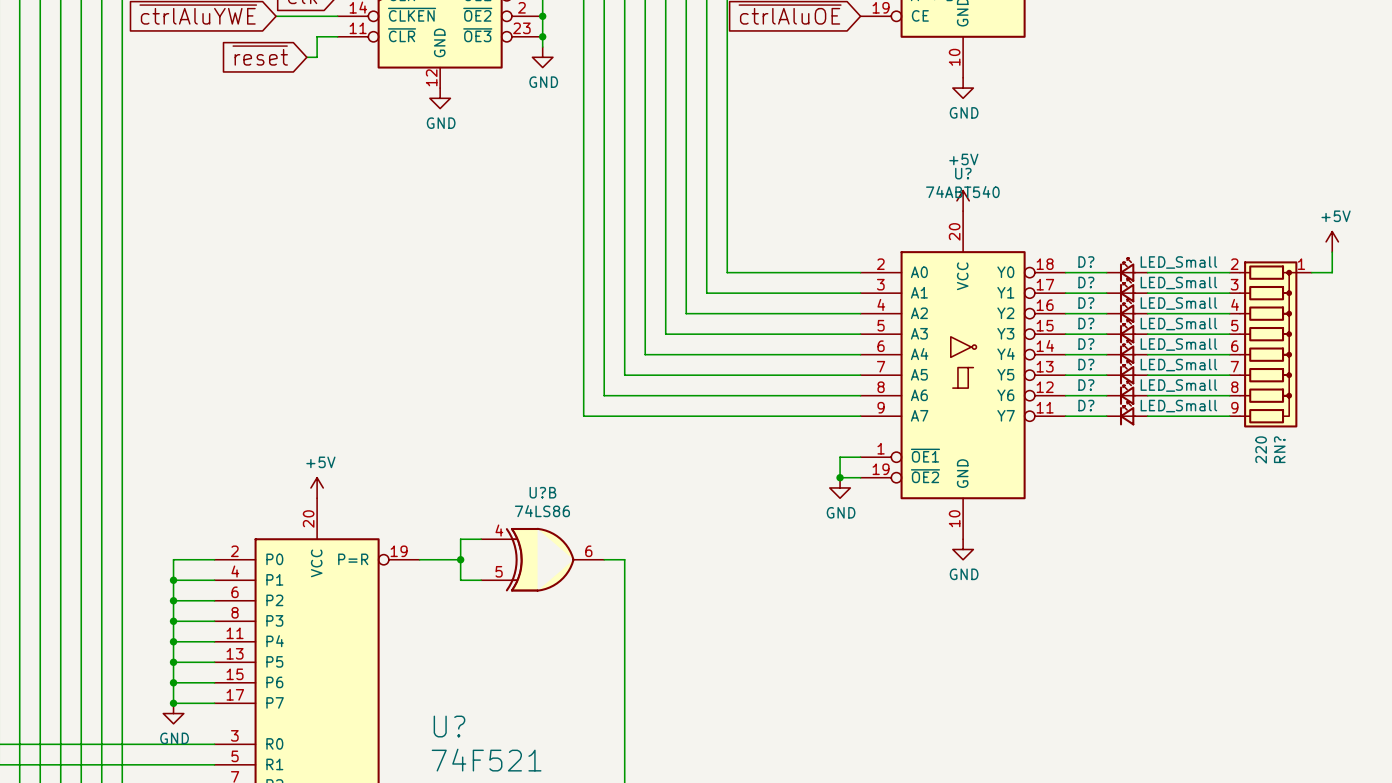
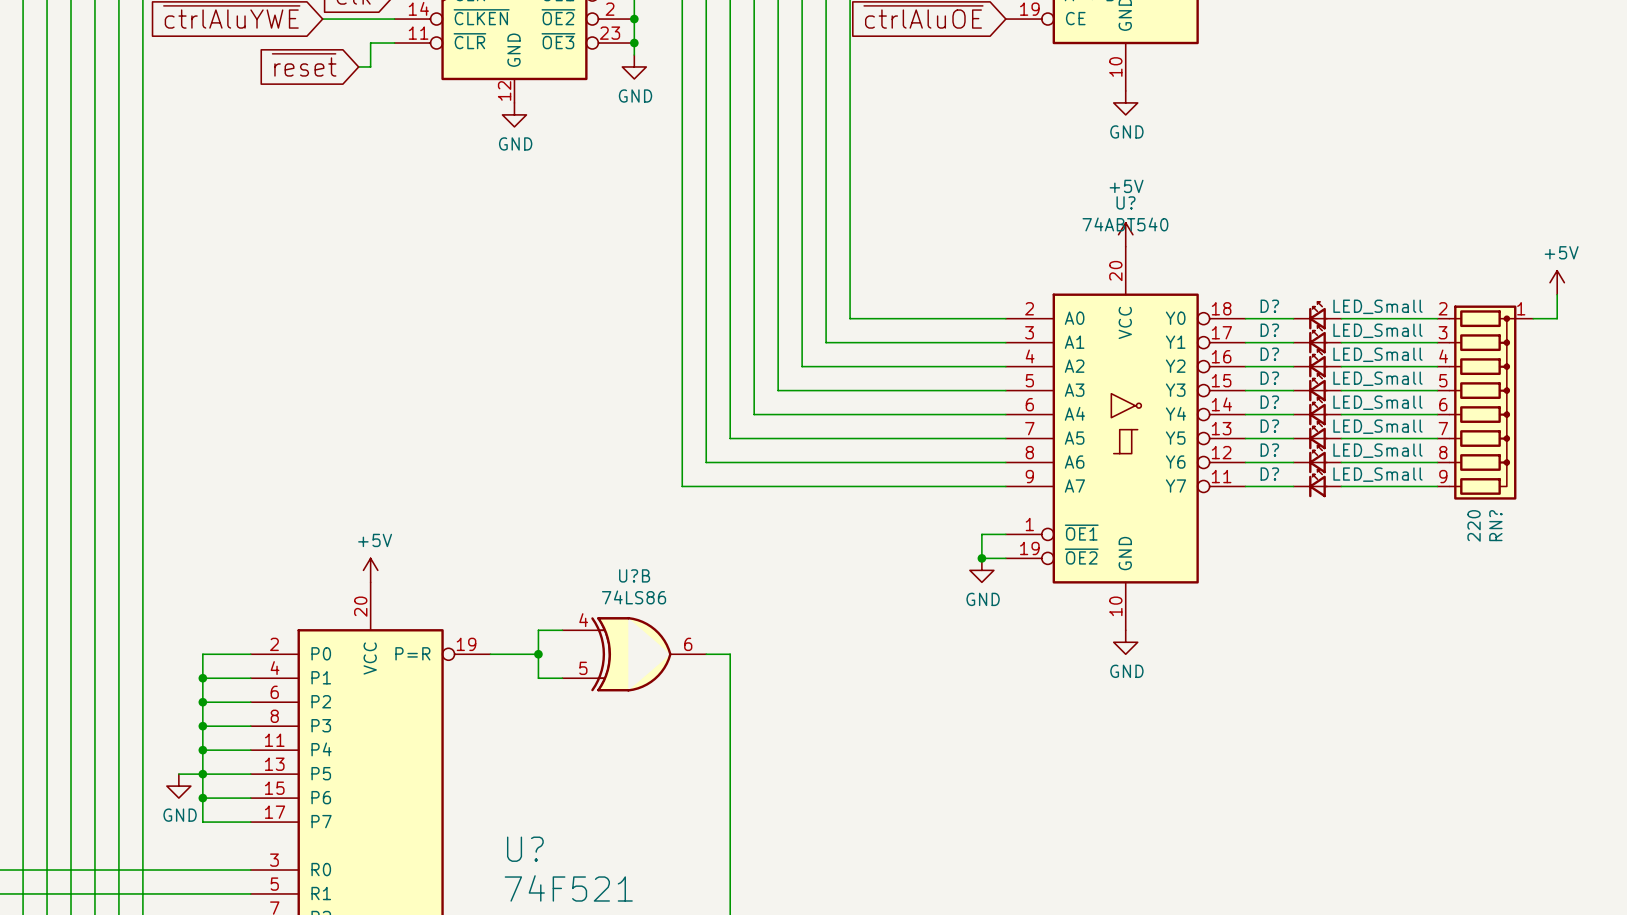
wire: none -> (178, 774) (202, 774)
junction: (173, 703) -> none
power symbol position: GND (173, 713) -> GND (178, 786)

